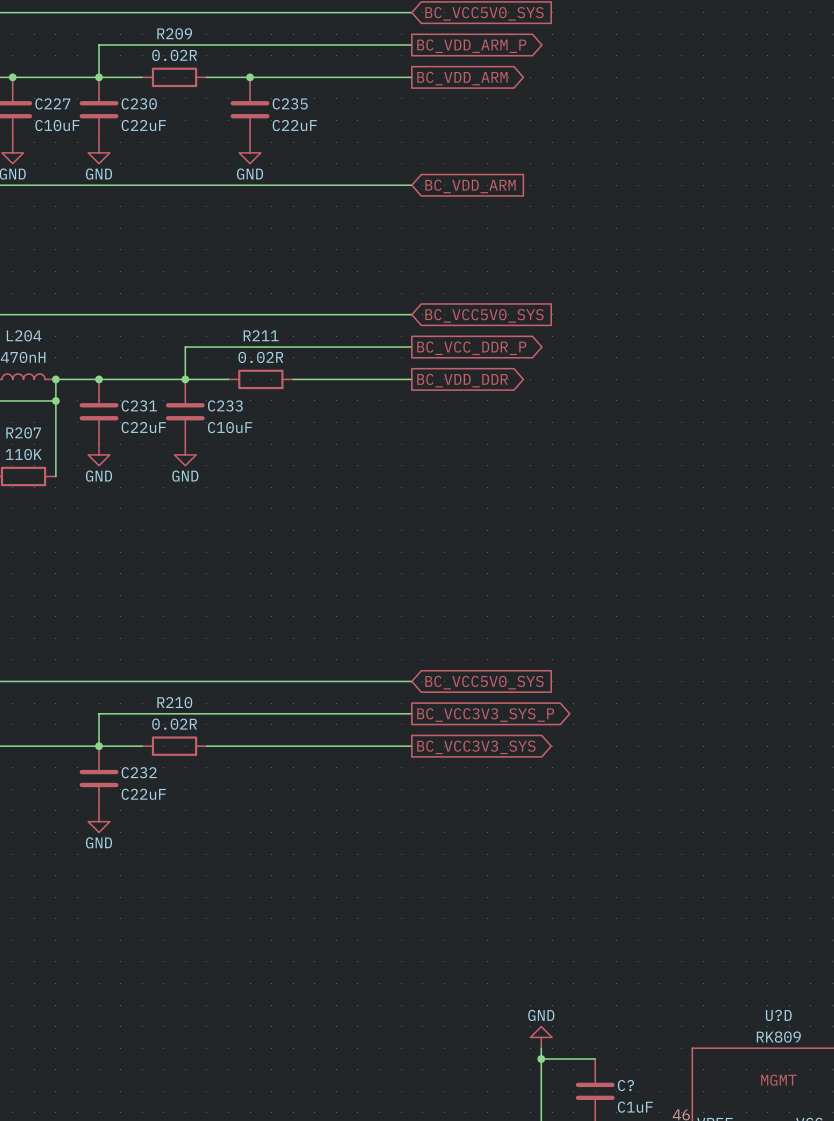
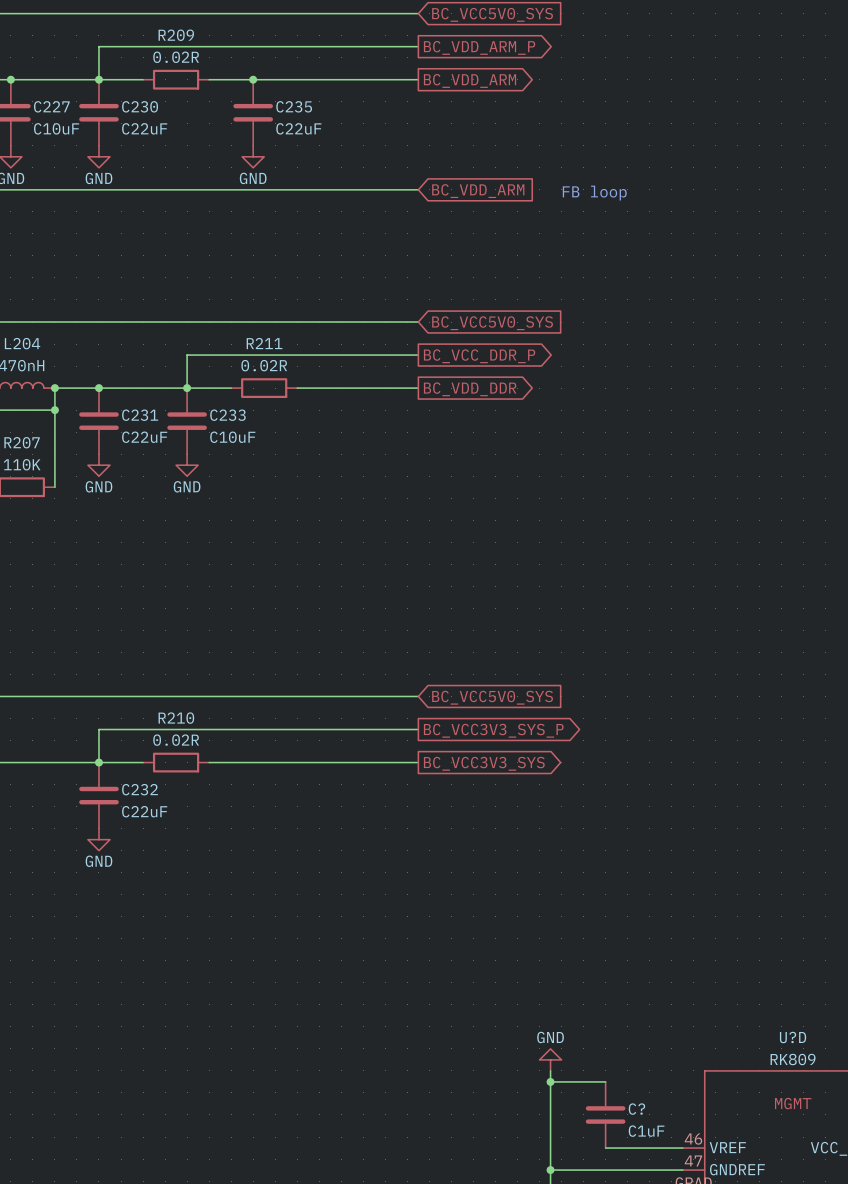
text: none -> FB loop (594, 193)

